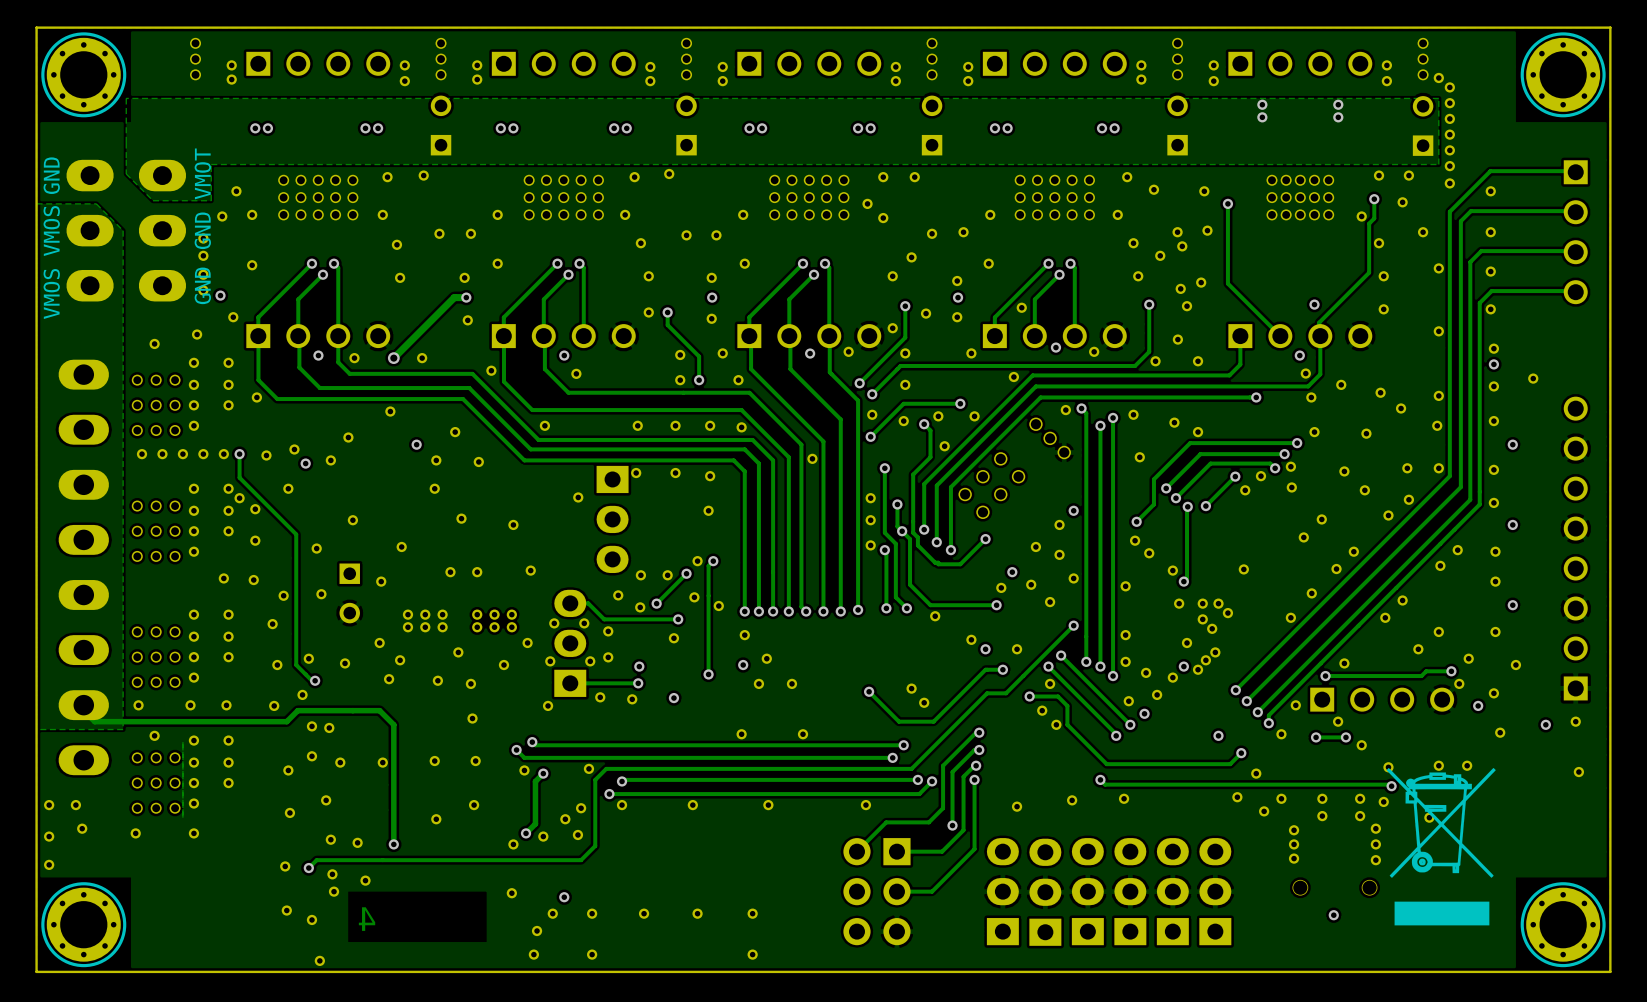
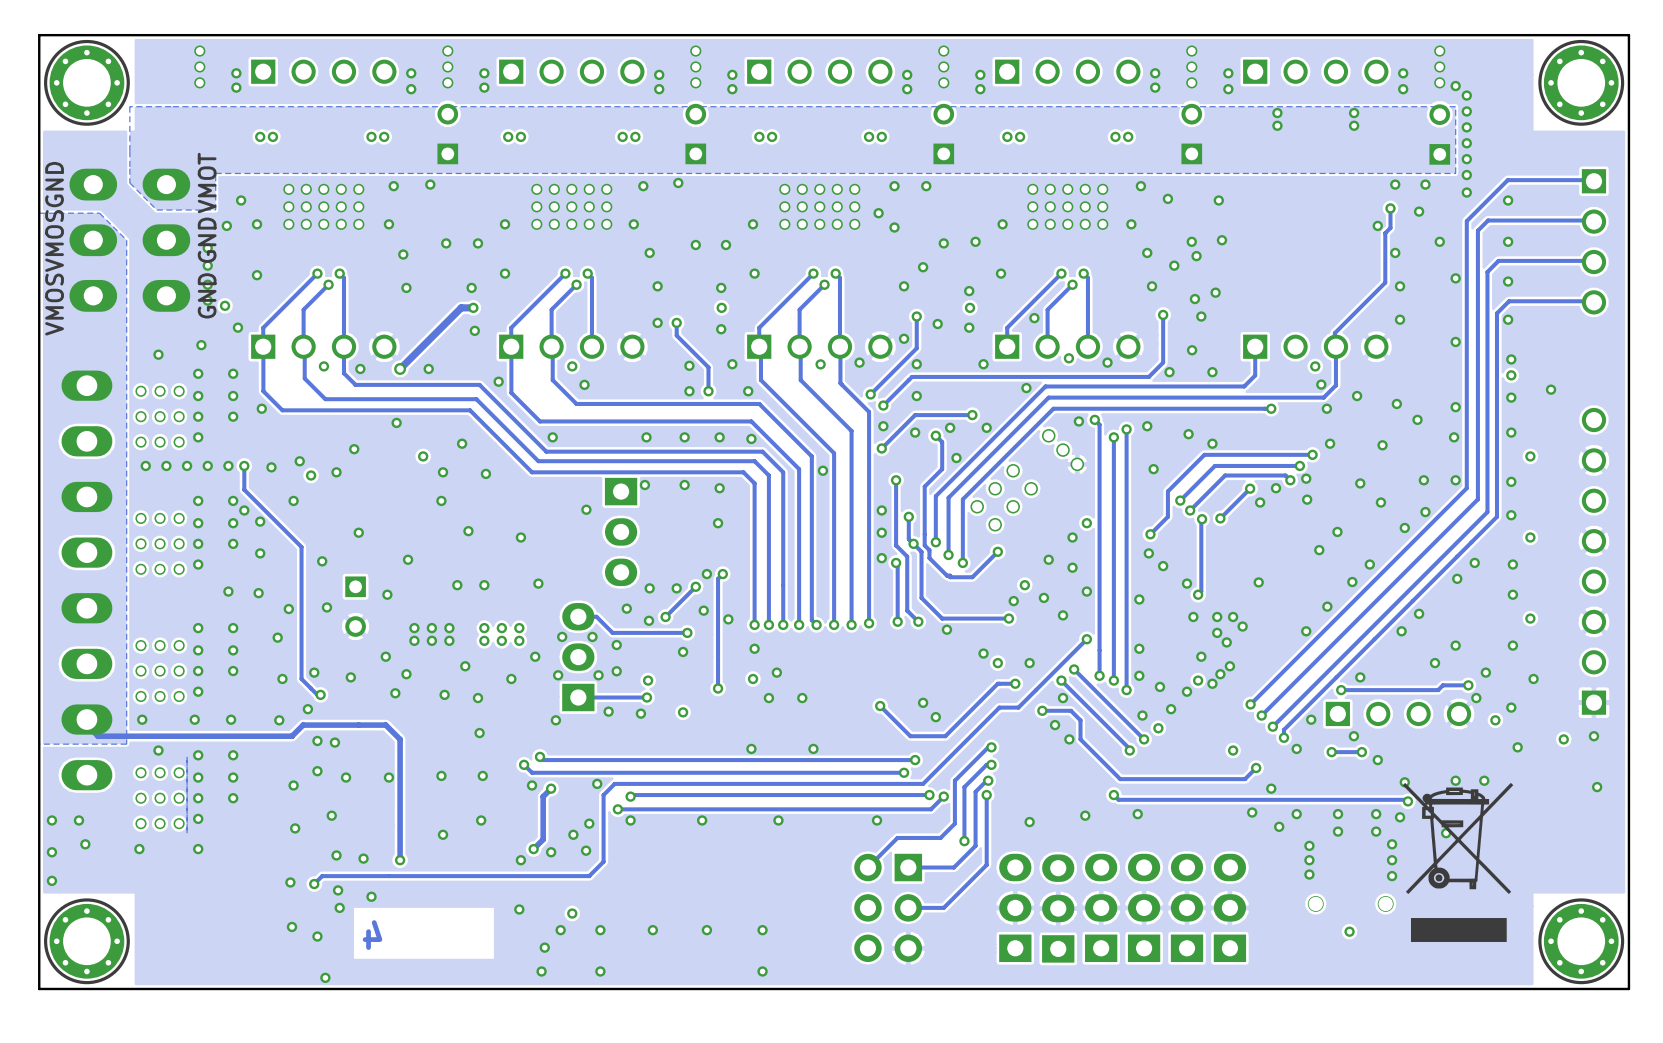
part: (1272, 180) -> none
part: (1286, 180) -> none
part: (1300, 180) -> none
part: (1314, 180) -> none
part: (1328, 180) -> none
part: (1272, 197) -> none
part: (1286, 197) -> none
part: (1300, 197) -> none
part: (1314, 197) -> none
part: (1328, 197) -> none
track: (1227, 203) (1227, 283) (1280, 336) -> none
via: (1227, 203) -> none
part: (1272, 214) -> none
part: (1286, 214) -> none
part: (1300, 214) -> none
part: (1314, 214) -> none
part: (1328, 214) -> none
via: (1314, 304) -> none

